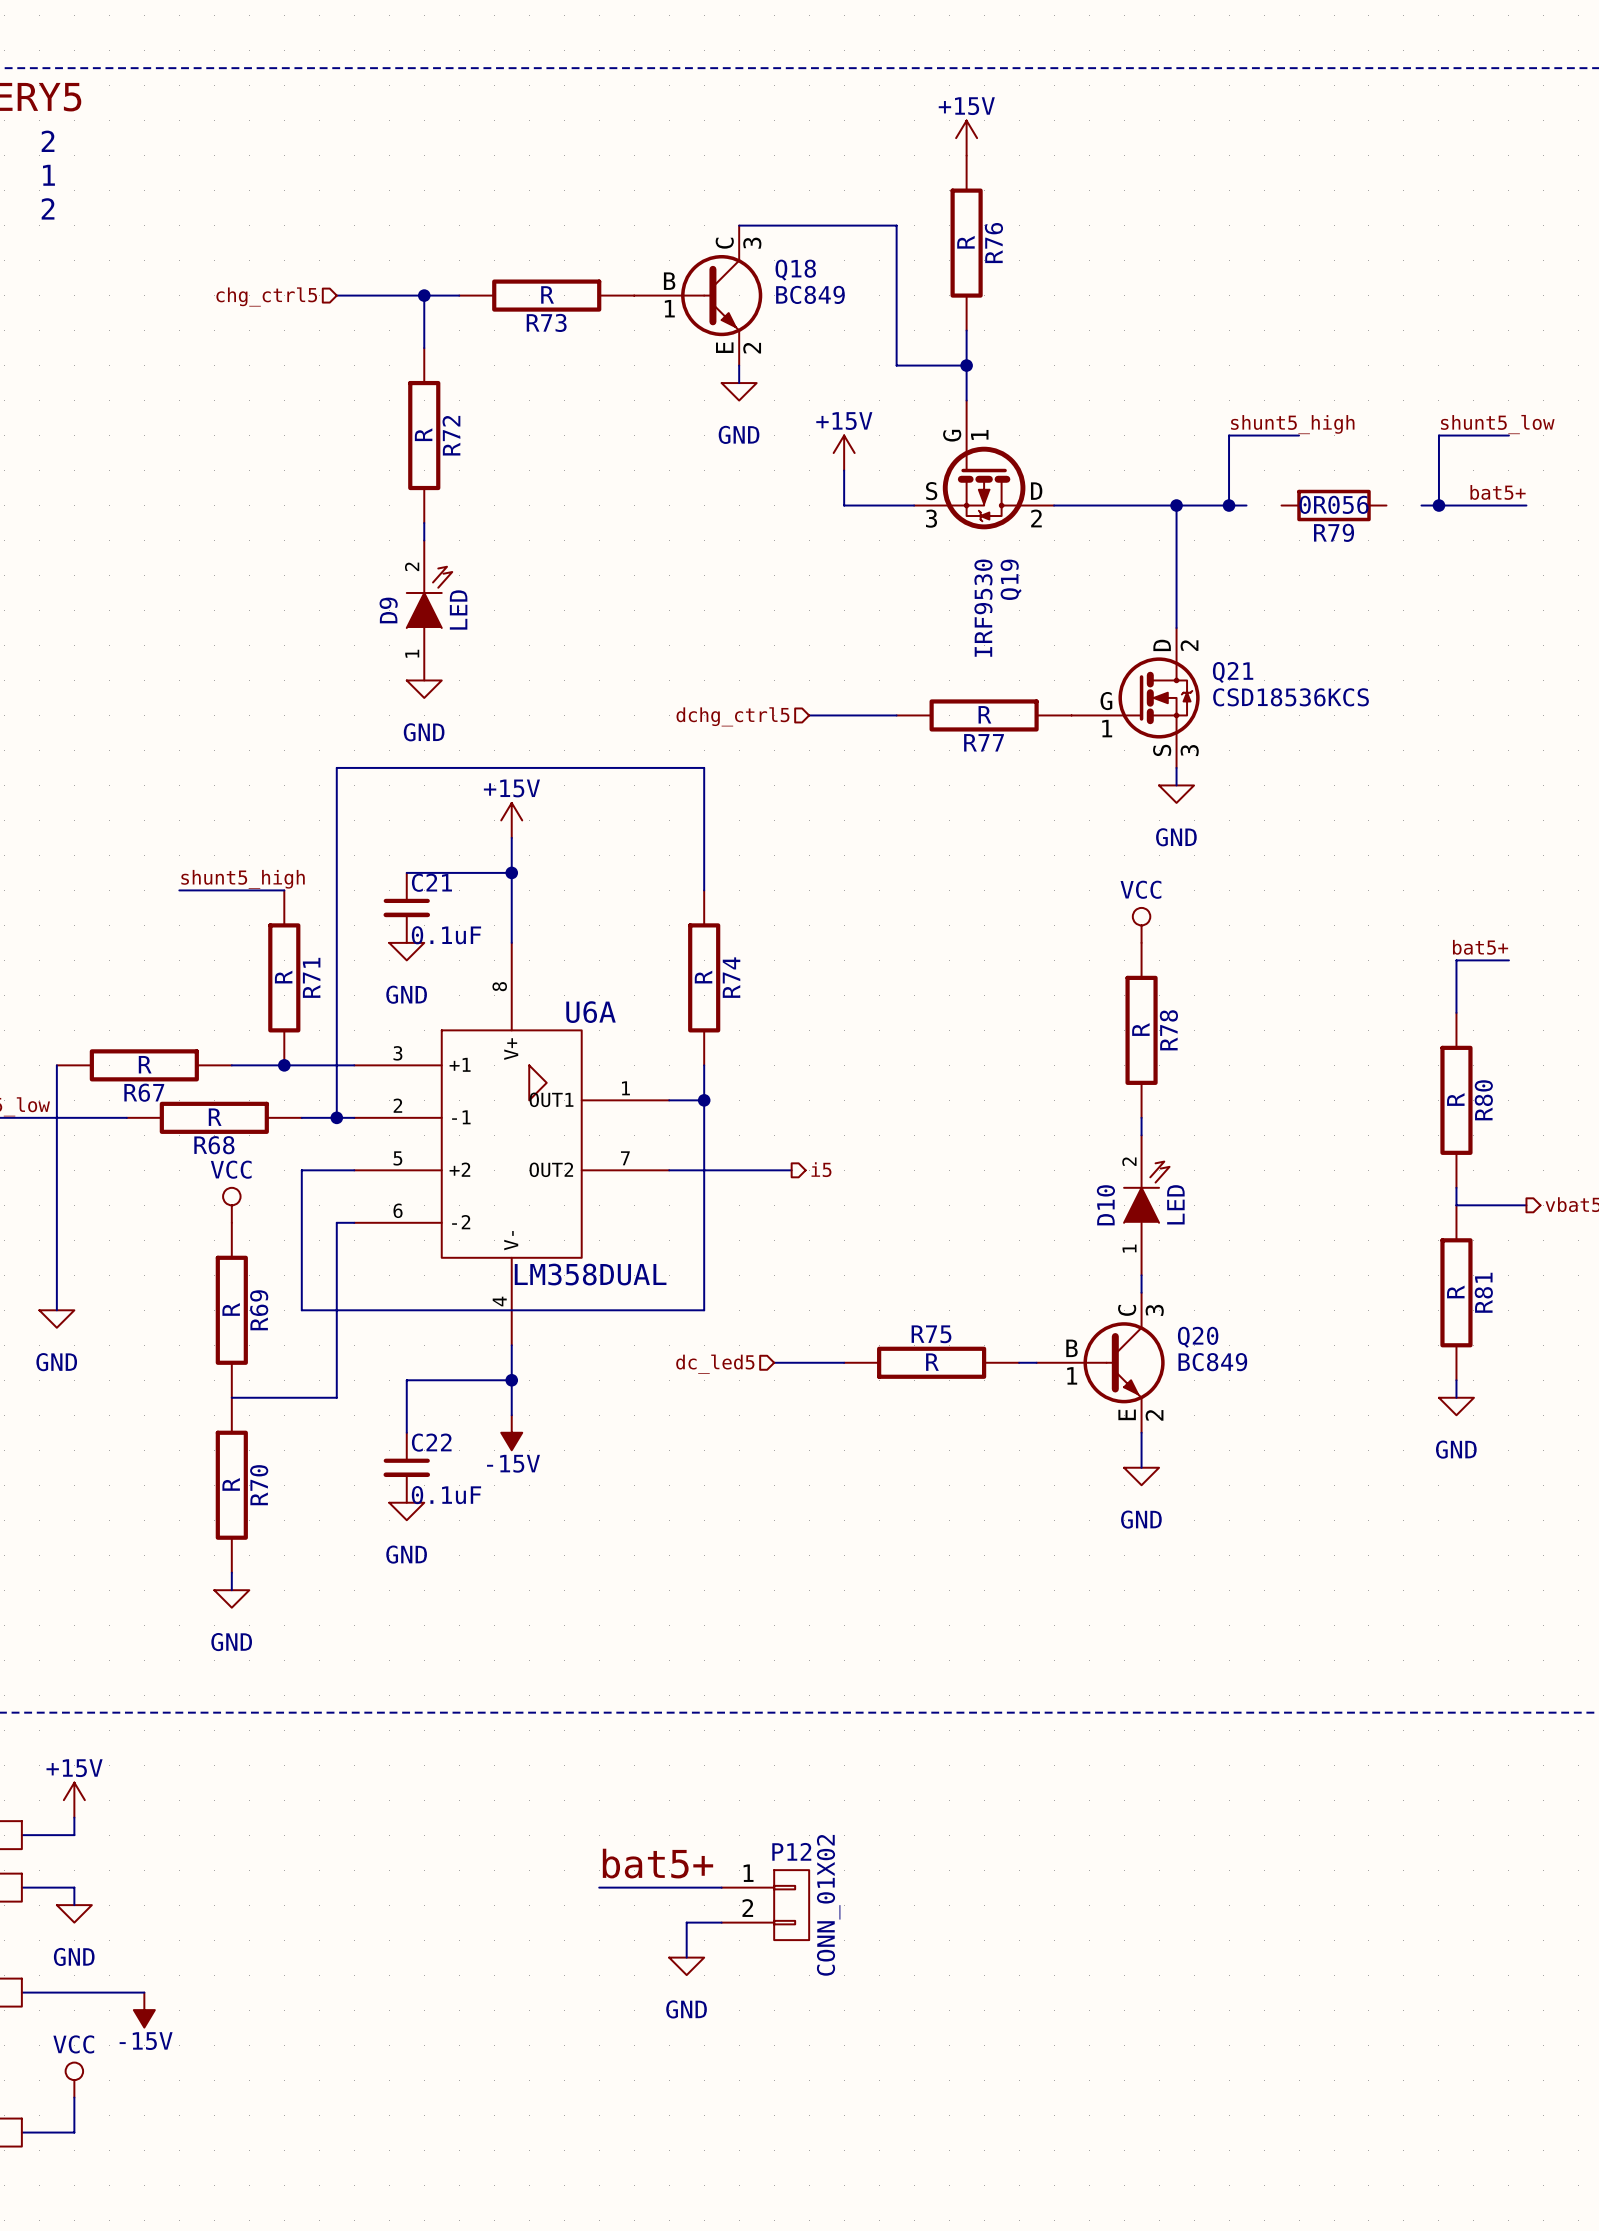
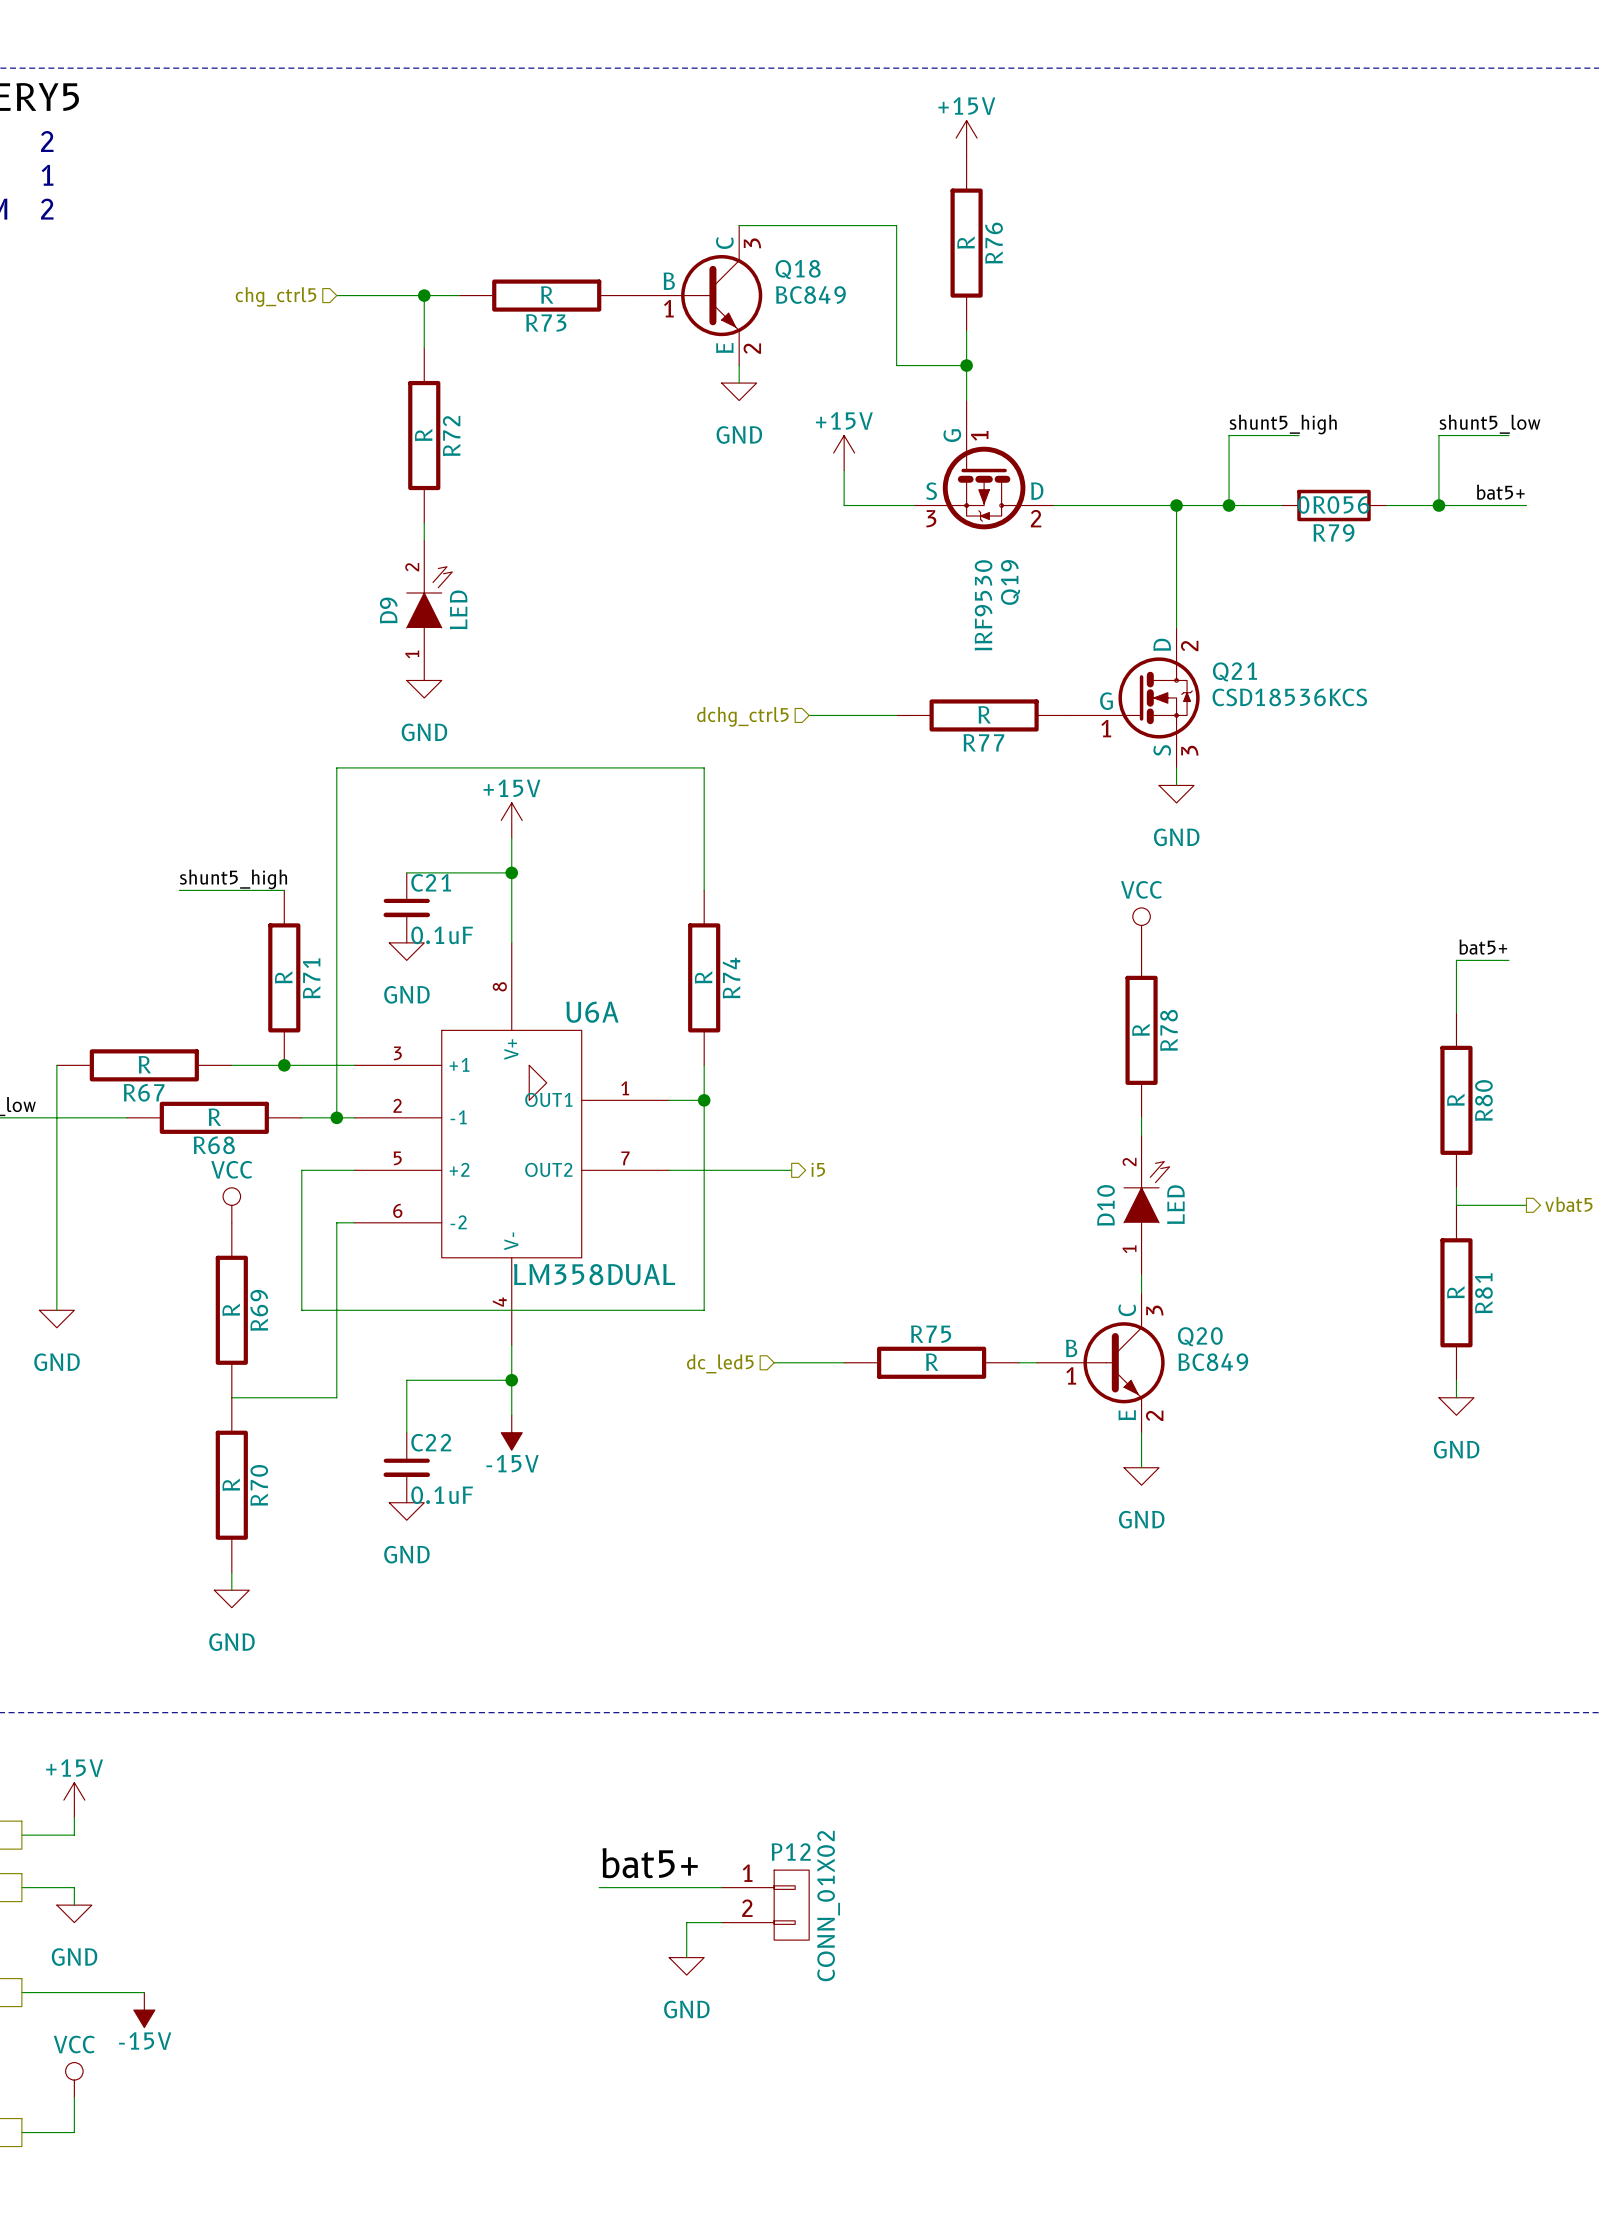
wire: none -> (1246, 505) (1281, 505)
wire: none -> (1386, 505) (1421, 505)

